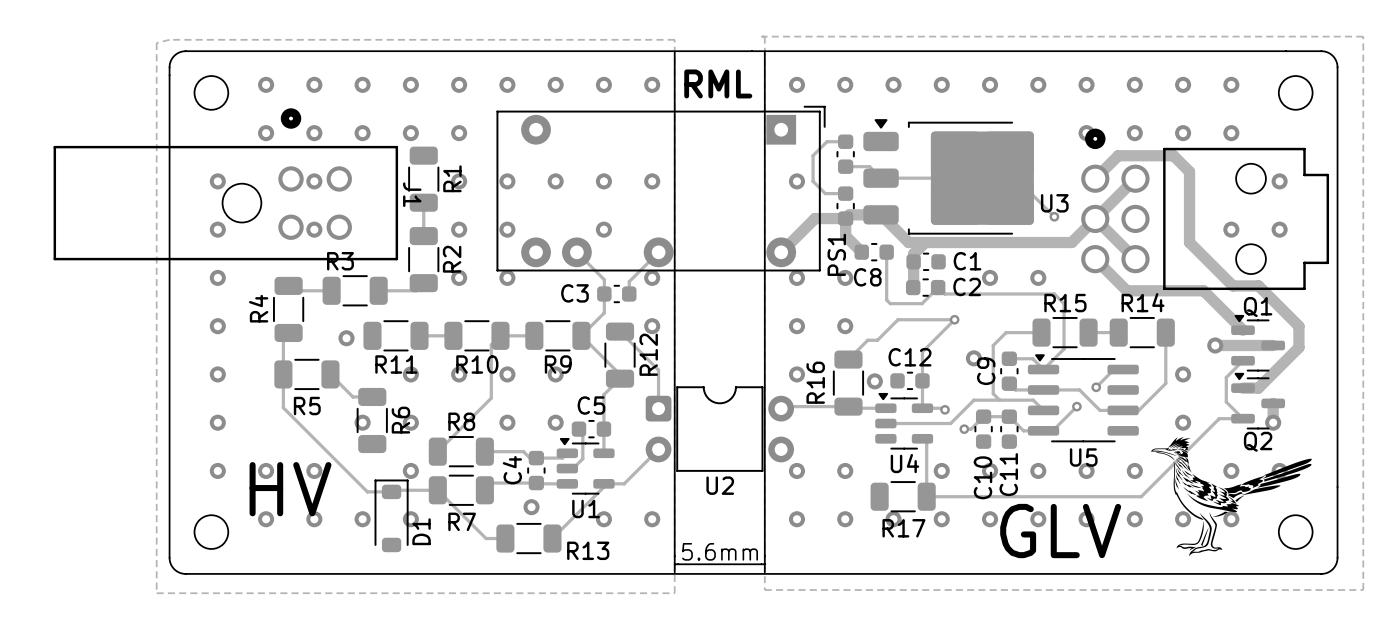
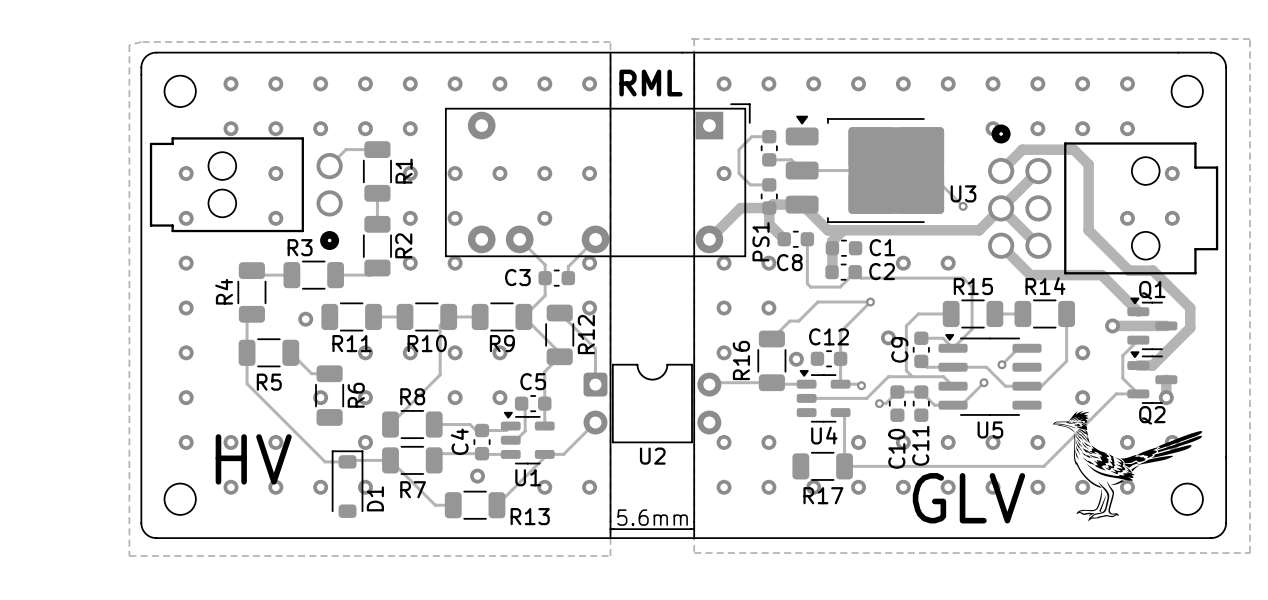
track: none -> (377, 149) (346, 149) (329, 166)
J1: (225, 184) -> none
part: none -> (246, 193)

